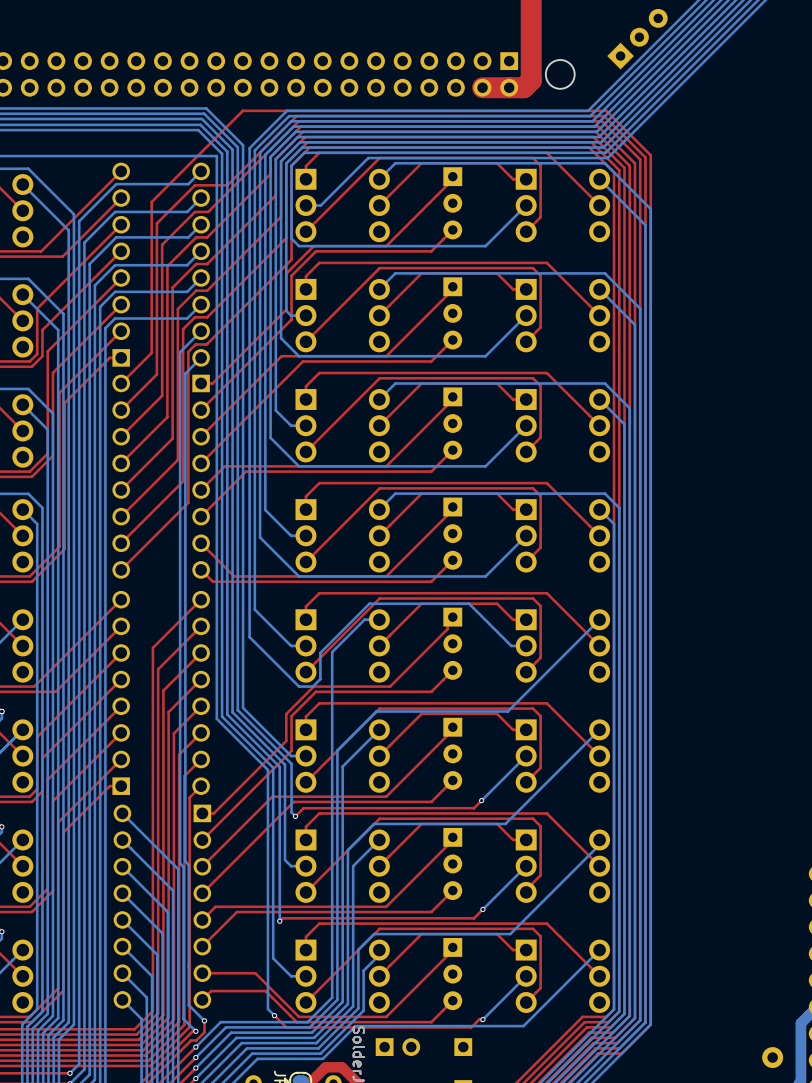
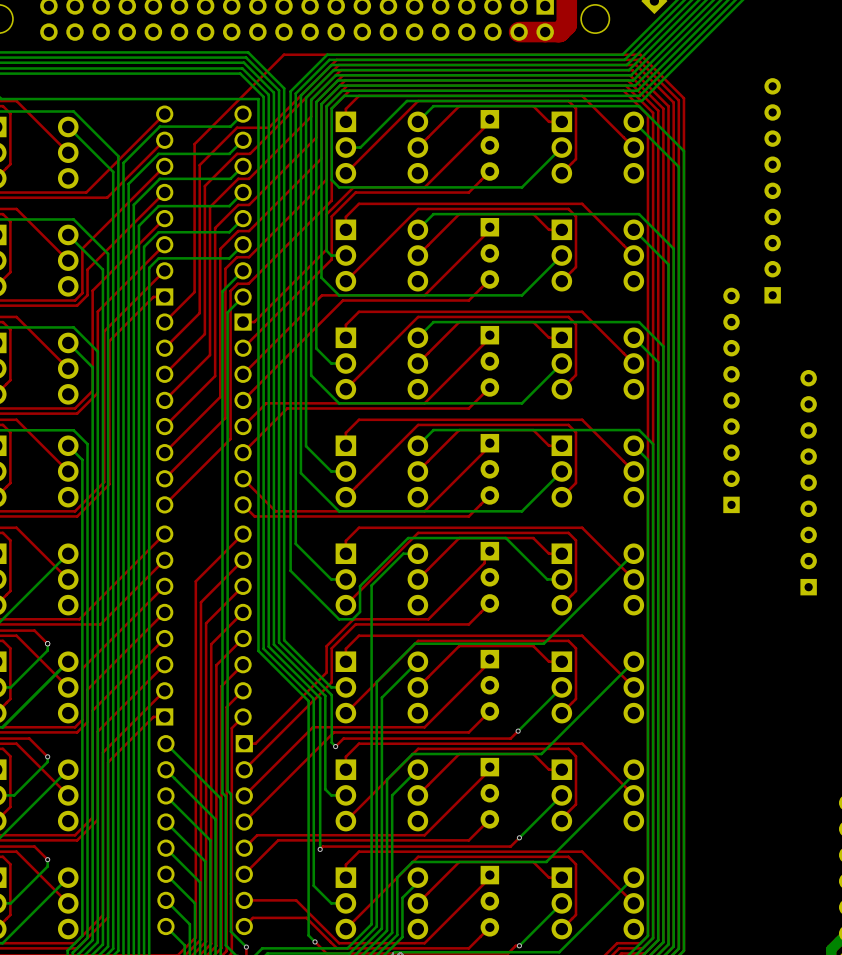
part: none -> (772, 190)
part: none -> (731, 400)
part: none -> (808, 482)

